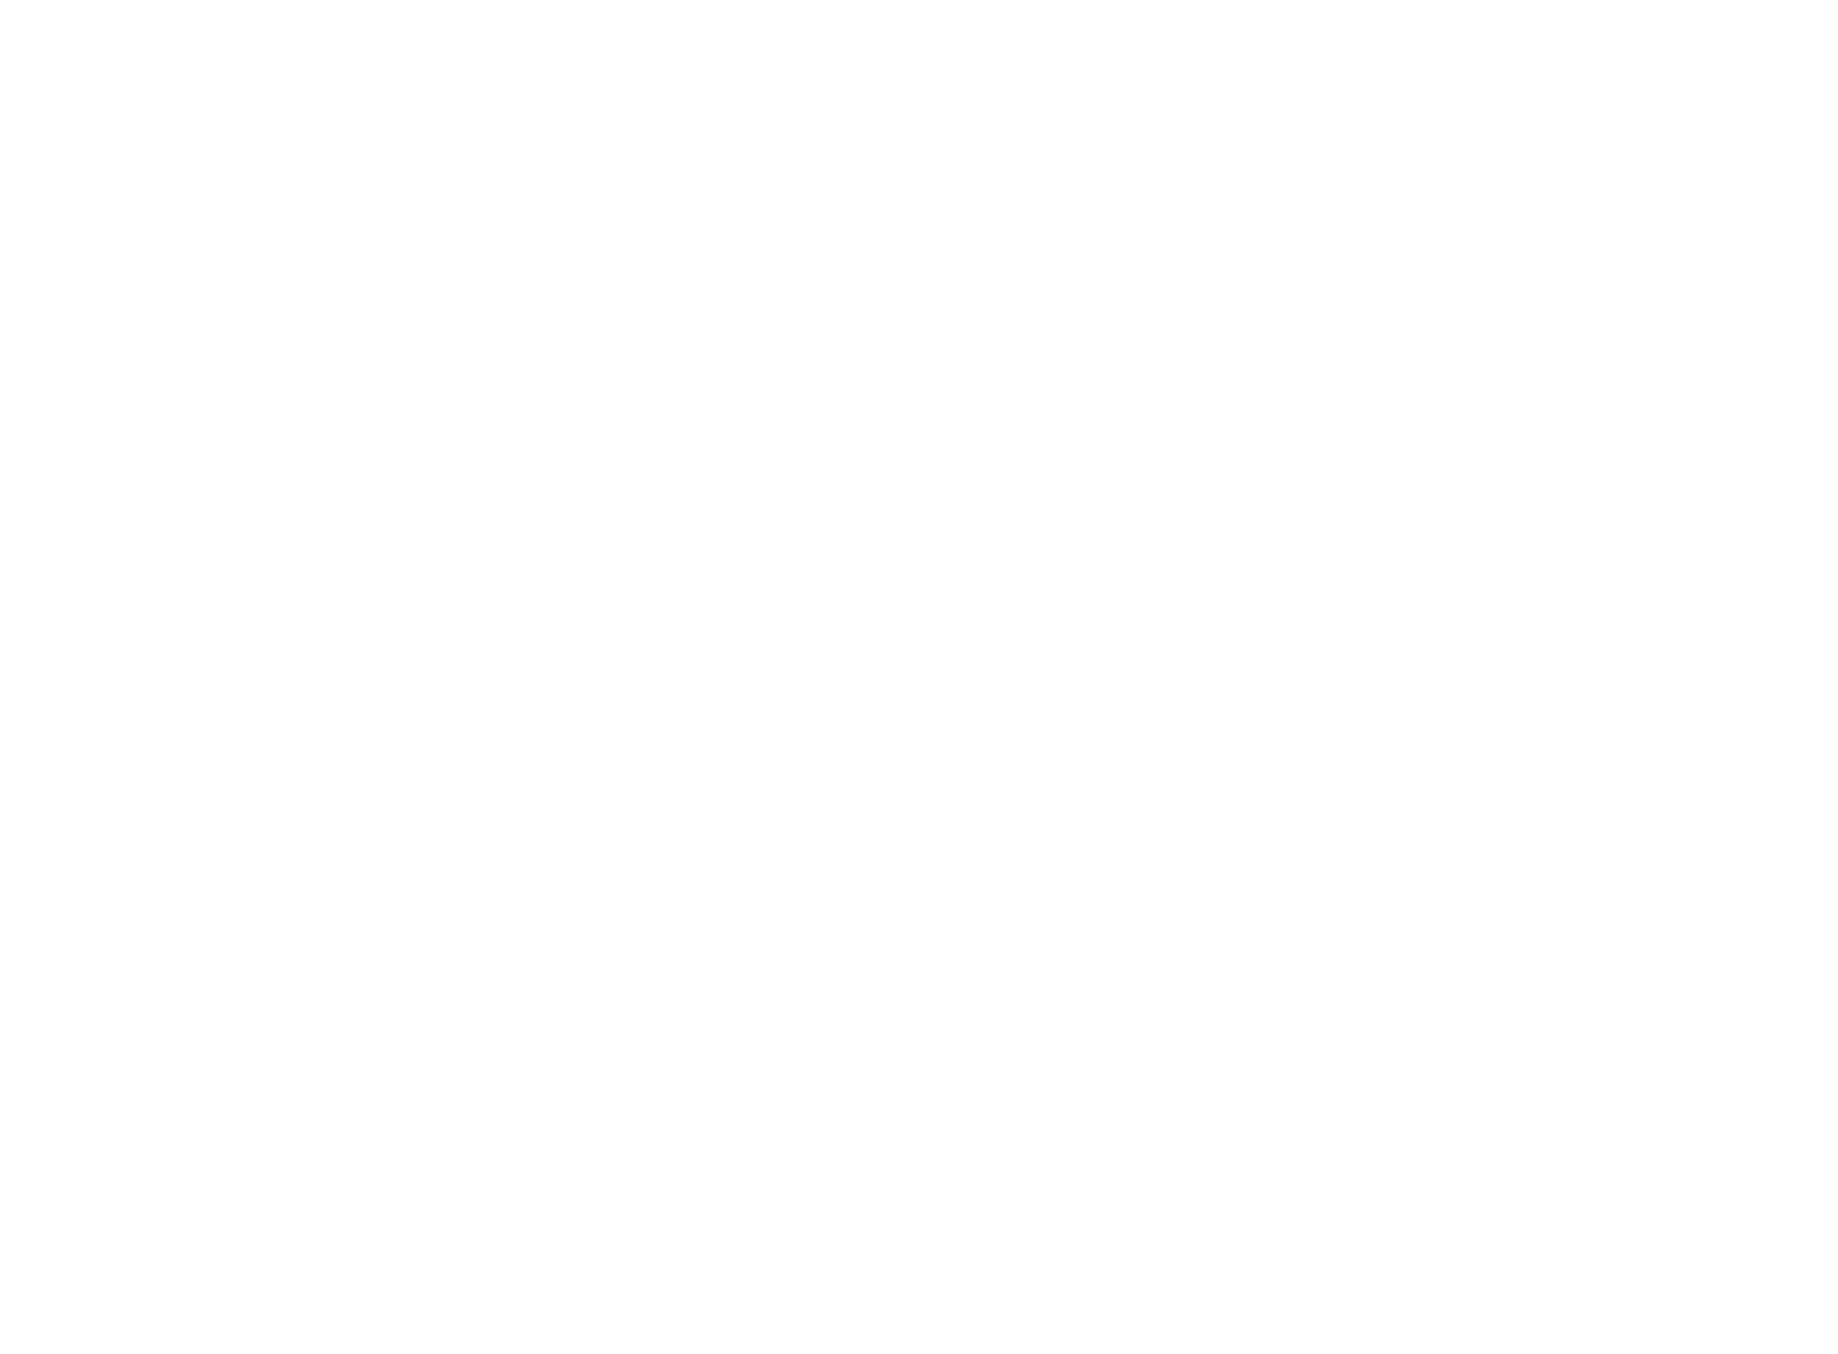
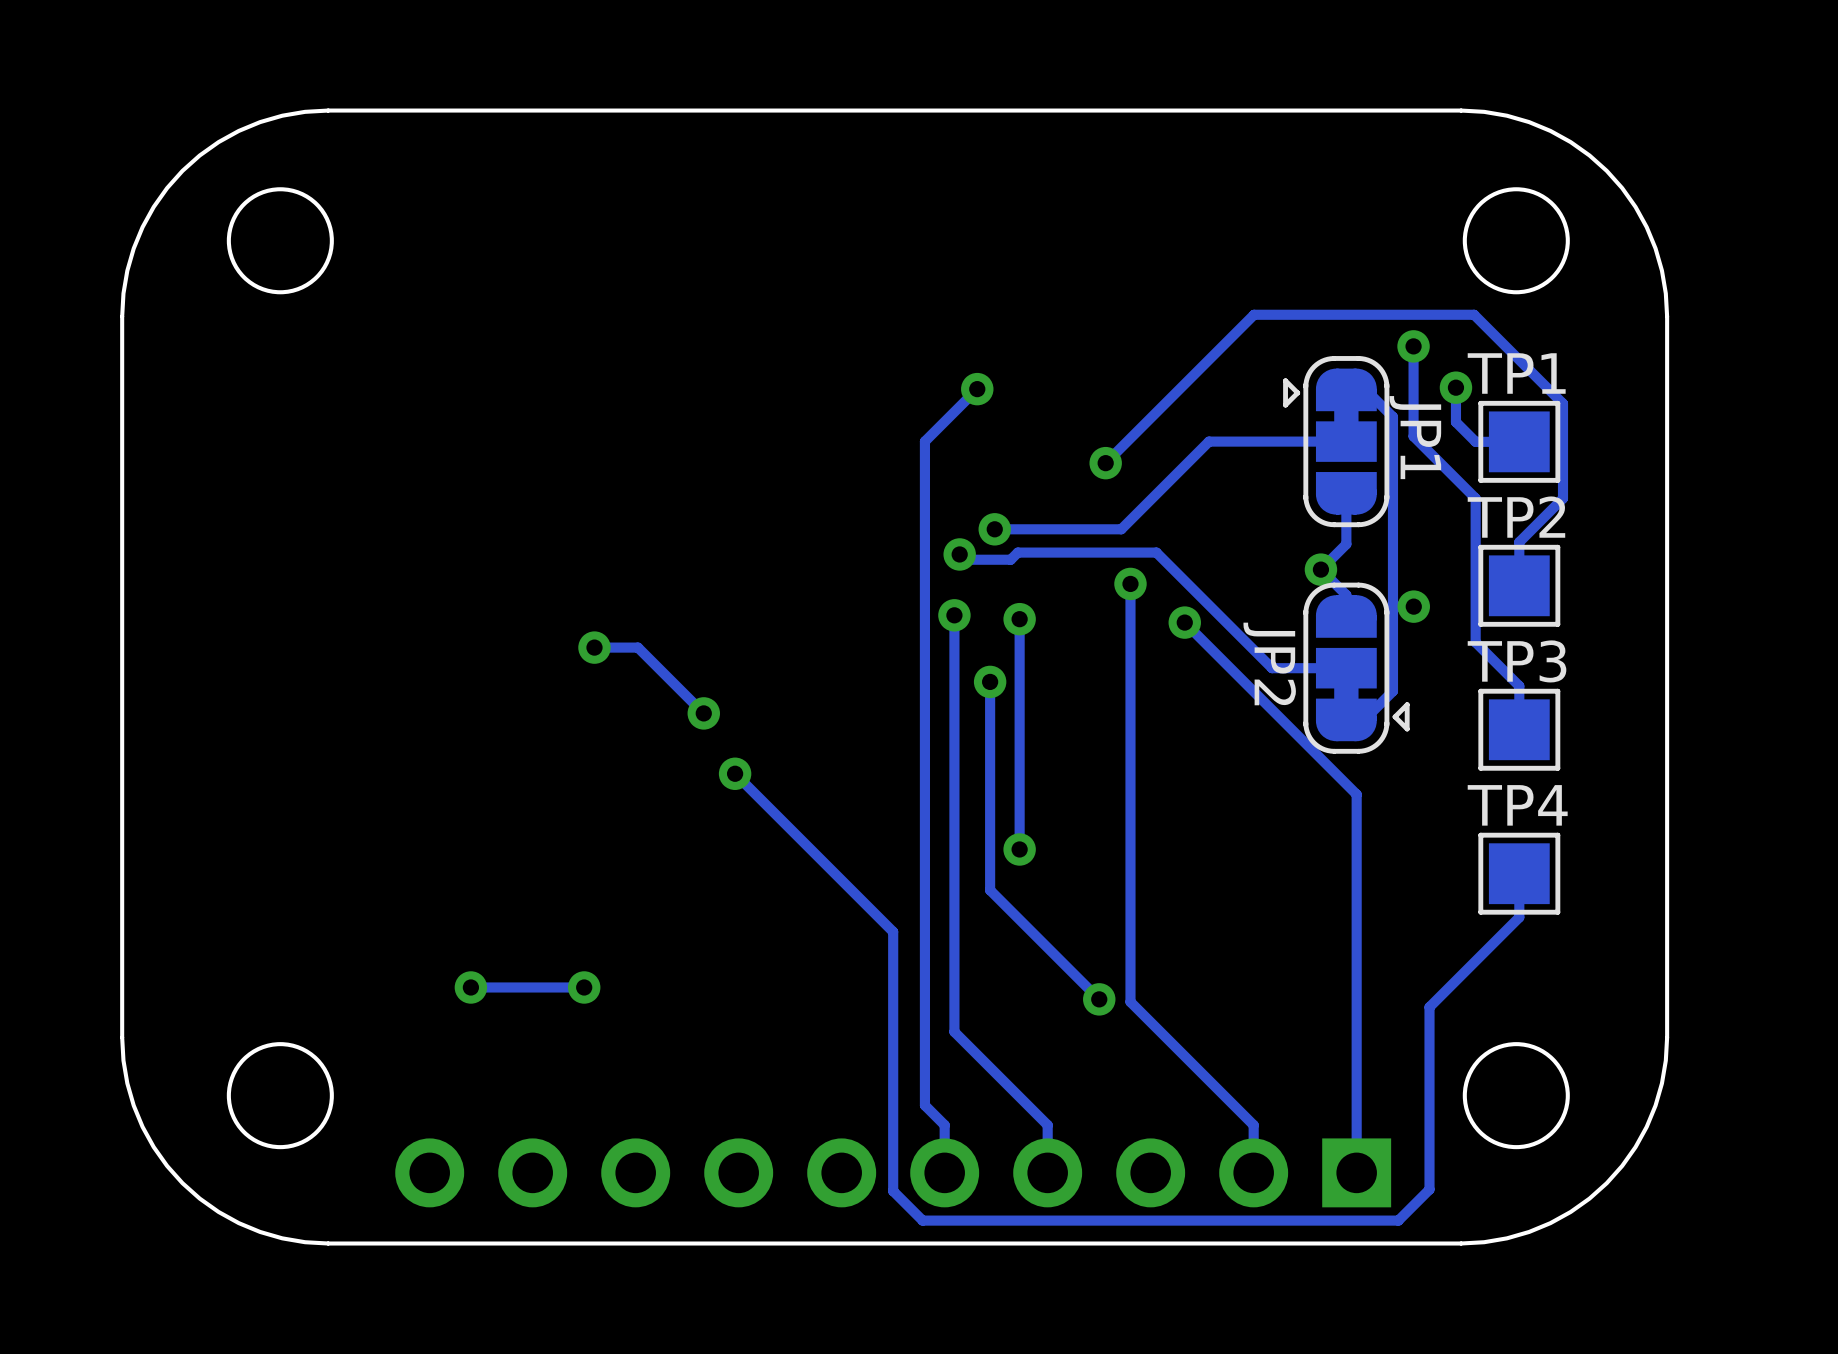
board edge: none -> (1461, 110) (328, 110) (305, 111) (260, 122) (238, 130) (199, 155) (167, 188) (142, 227) (127, 270) (122, 316) (122, 1037) (127, 1083) (133, 1105) (153, 1147) (167, 1165) (199, 1198) (238, 1223) (282, 1238) (328, 1243) (1461, 1243) (1484, 1242) (1529, 1231) (1570, 1211) (1589, 1198) (1622, 1165) (1646, 1126) (1661, 1083) (1665, 1060) (1665, 293) (1655, 248) (1646, 227) (1622, 188) (1589, 155) (1570, 142) (1529, 122) (1484, 111) (1461, 110)
round board edge: none -> [226, 187, 334, 295]
round board edge: none -> [1462, 187, 1570, 295]
track: none -> (1413, 346) (1413, 436) (1475, 498) (1475, 642) (1519, 686) (1519, 729)
via: none -> (1413, 346)
track: none -> (1455, 387) (1455, 422) (1475, 441) (1519, 441)
via: none -> (1455, 387)
track: none -> (1346, 388) (1364, 388) (1392, 417) (1392, 691) (1363, 720) (1346, 720)
track: none -> (977, 389) (924, 441) (924, 1105) (944, 1125) (944, 1172)
via: none -> (977, 389)
JP1: none -> (1336, 441)
track: none -> (1346, 441) (1209, 441) (1121, 529) (994, 529)
TP1: none -> (1519, 441)
track: none -> (1105, 463) (1254, 314) (1474, 314) (1562, 403) (1562, 498) (1519, 542) (1519, 585)
via: none -> (1105, 463)
track: none -> (1346, 494) (1346, 544) (1320, 569) (1346, 595) (1346, 615)
via: none -> (994, 529)
track: none -> (959, 554) (964, 559) (1010, 559) (1017, 552) (1156, 552) (1272, 668) (1346, 668)
via: none -> (959, 554)
via: none -> (1320, 569)
track: none -> (1130, 583) (1130, 1001) (1253, 1125) (1253, 1172)
via: none -> (1130, 583)
TP2: none -> (1519, 585)
via: none -> (1413, 606)
track: none -> (954, 615) (954, 1031) (1047, 1125) (1047, 1172)
via: none -> (954, 615)
track: none -> (1019, 619) (1019, 849)
via: none -> (1019, 619)
track: none -> (1184, 622) (1356, 794) (1356, 1172)
via: none -> (1184, 622)
track: none -> (594, 647) (637, 647) (703, 713)
via: none -> (594, 647)
JP2: none -> (1356, 668)
track: none -> (990, 681) (990, 890) (1099, 999)
via: none -> (990, 681)
via: none -> (703, 713)
TP3: none -> (1519, 729)
track: none -> (735, 773) (893, 931) (893, 1191) (922, 1220) (1398, 1220) (1429, 1189) (1429, 1007) (1519, 917) (1519, 873)
via: none -> (735, 773)
via: none -> (1019, 849)
TP4: none -> (1519, 873)
via: none -> (470, 987)
track: none -> (584, 987) (470, 987)
via: none -> (584, 987)
via: none -> (1099, 999)
round board edge: none -> [226, 1042, 334, 1150]
round board edge: none -> [1462, 1042, 1570, 1150]
part: none -> (893, 1172)

